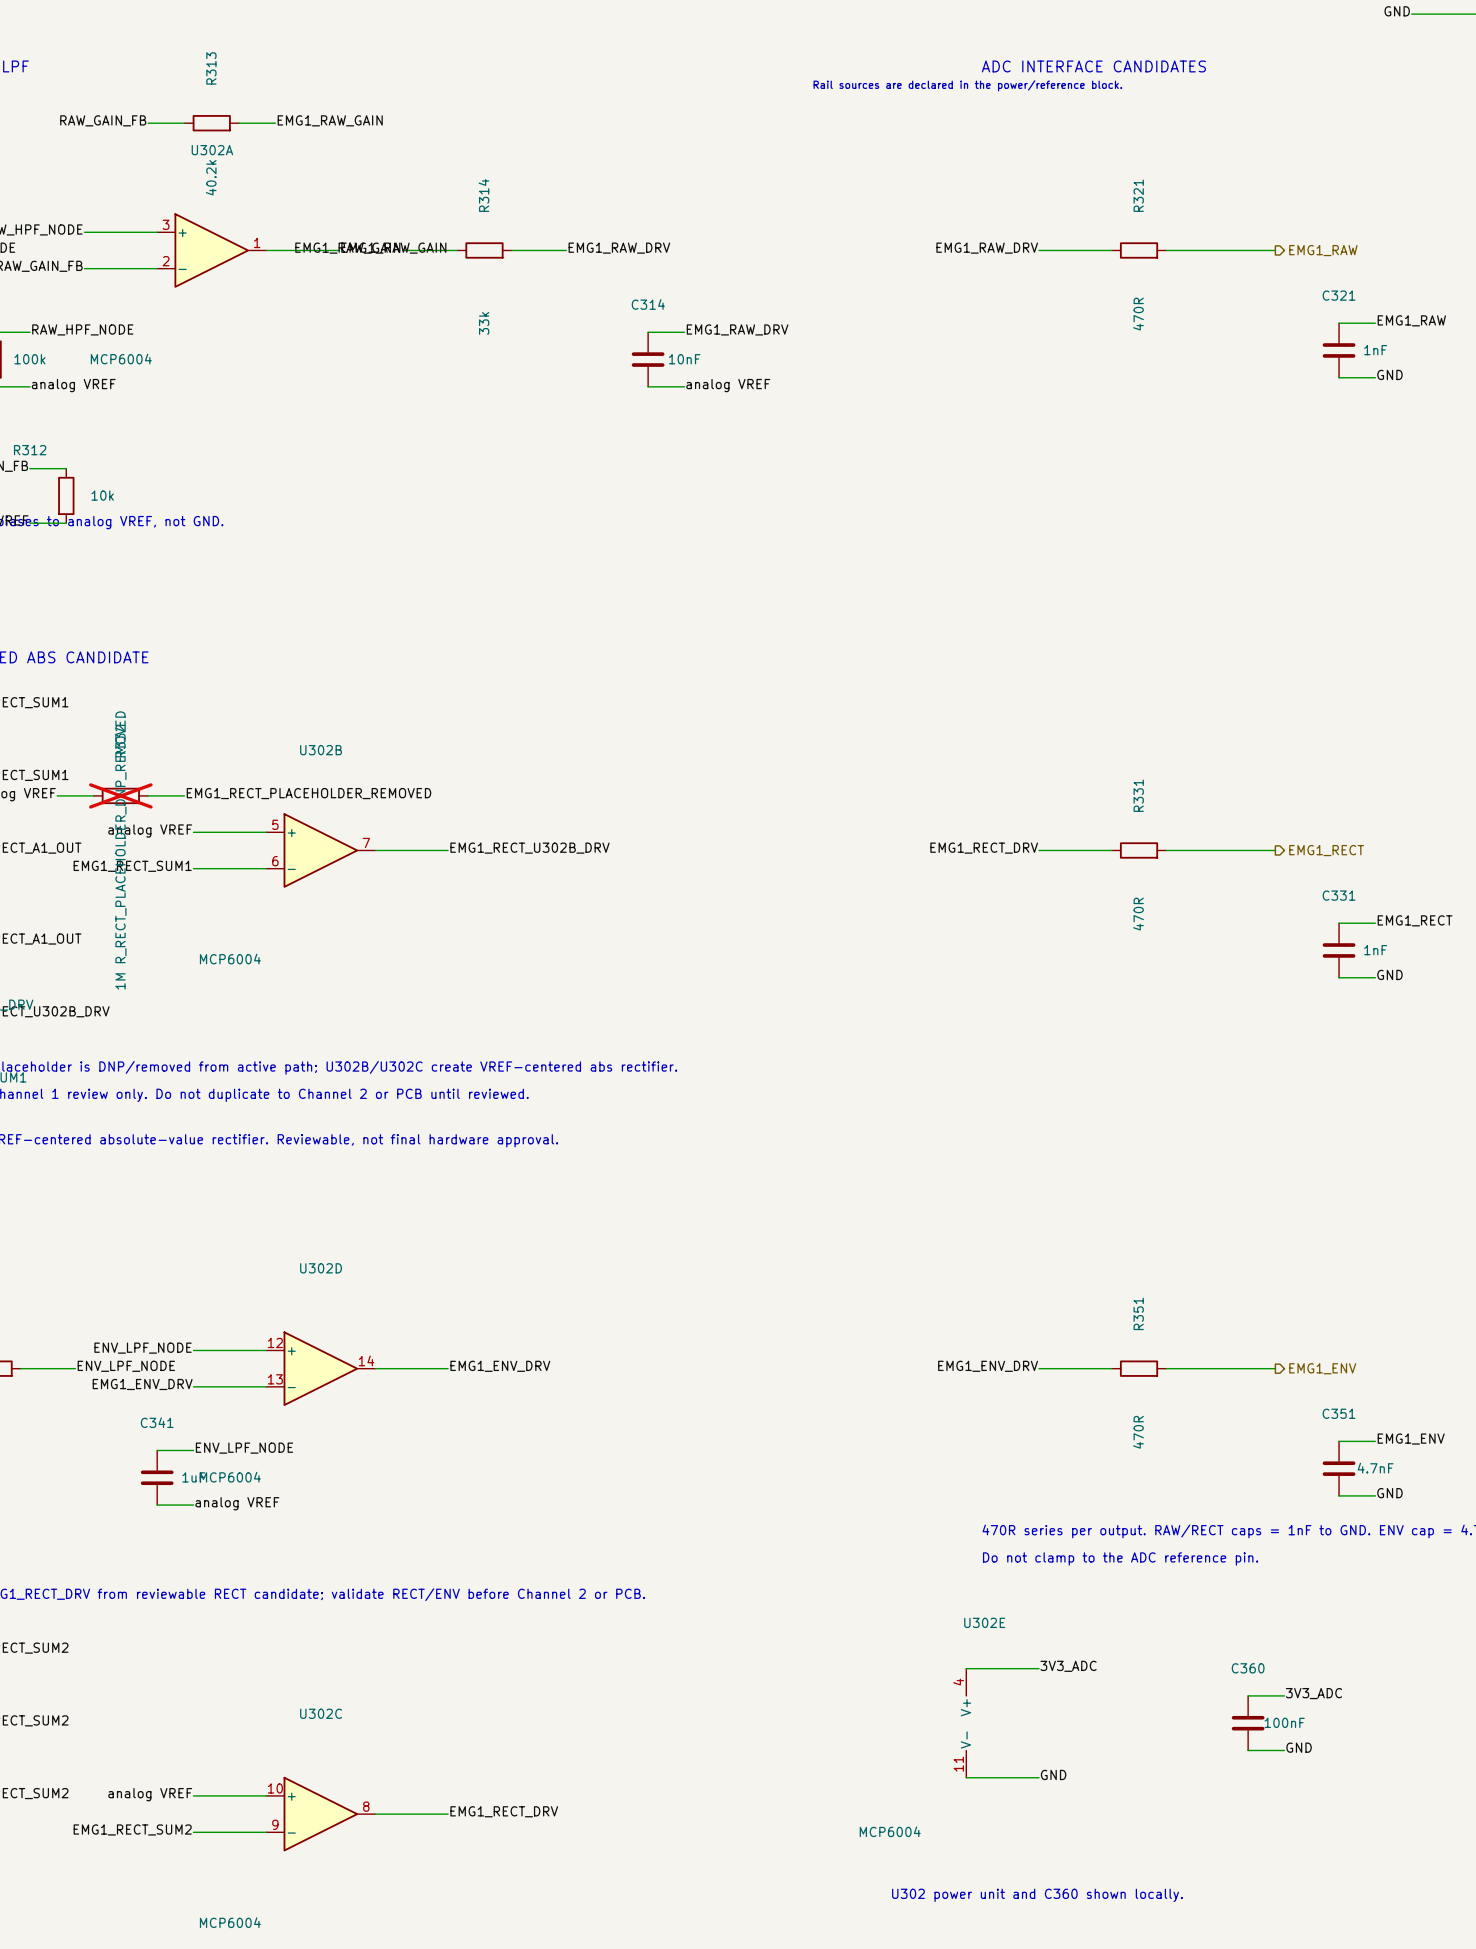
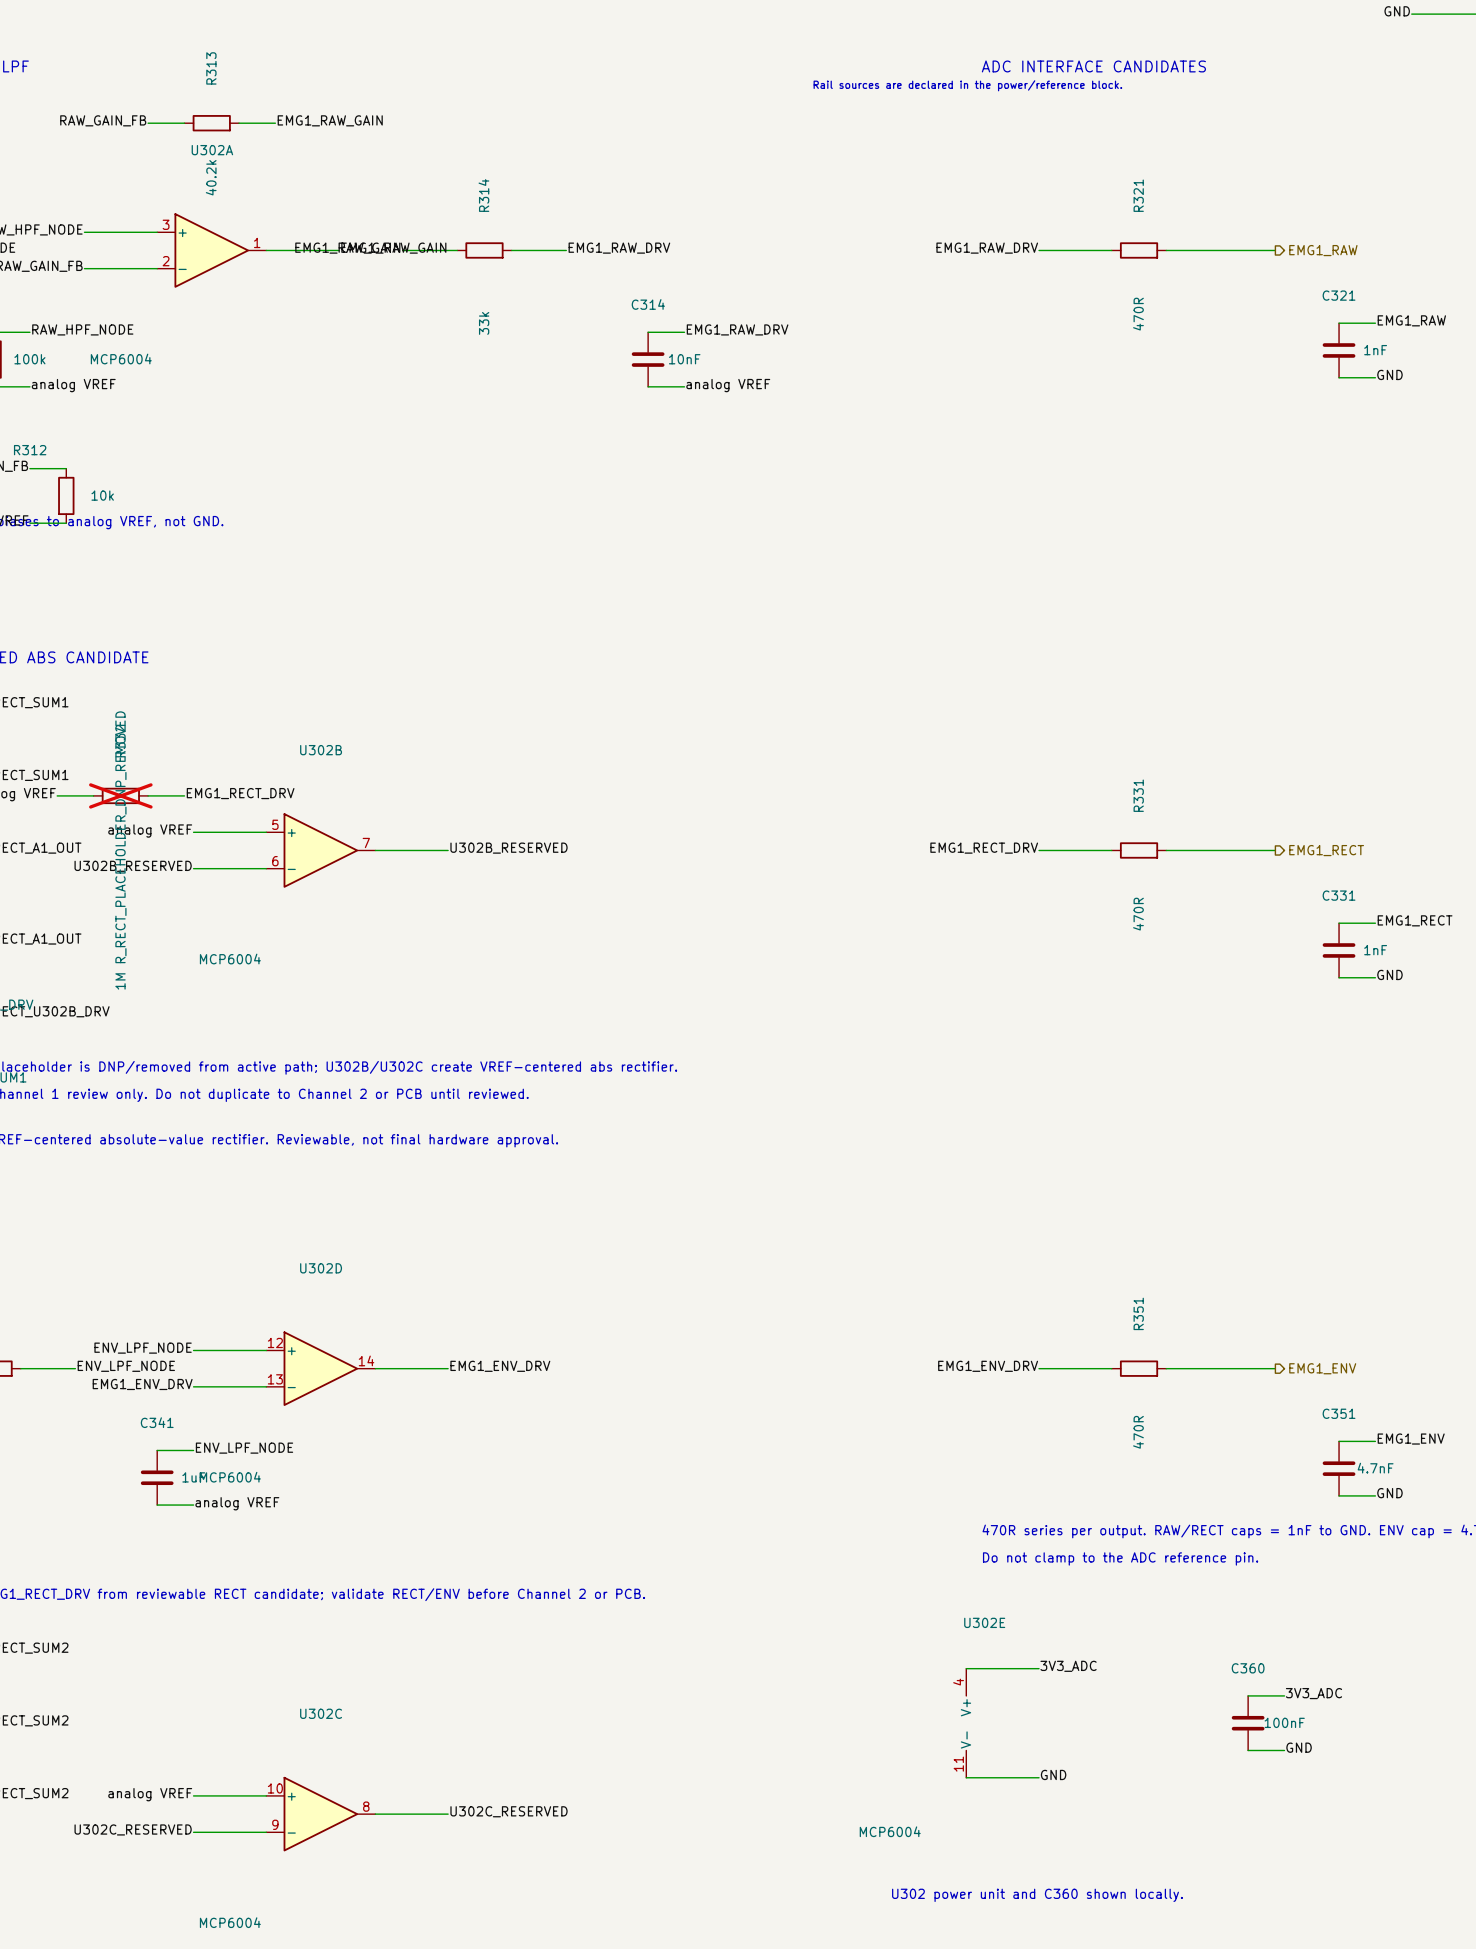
label: EMG1_RECT_PLACEHOLDER_REMOVED (309, 793) -> EMG1_RECT_DRV (240, 793)
label: EMG1_RECT_U302B_DRV (530, 848) -> U302B_RESERVED (509, 848)
label: EMG1_RECT_SUM1 (132, 866) -> U302B_RESERVED (133, 866)
label: EMG1_RECT_DRV (504, 1811) -> U302C_RESERVED (509, 1811)
label: EMG1_RECT_SUM2 (132, 1829) -> U302C_RESERVED (133, 1829)

